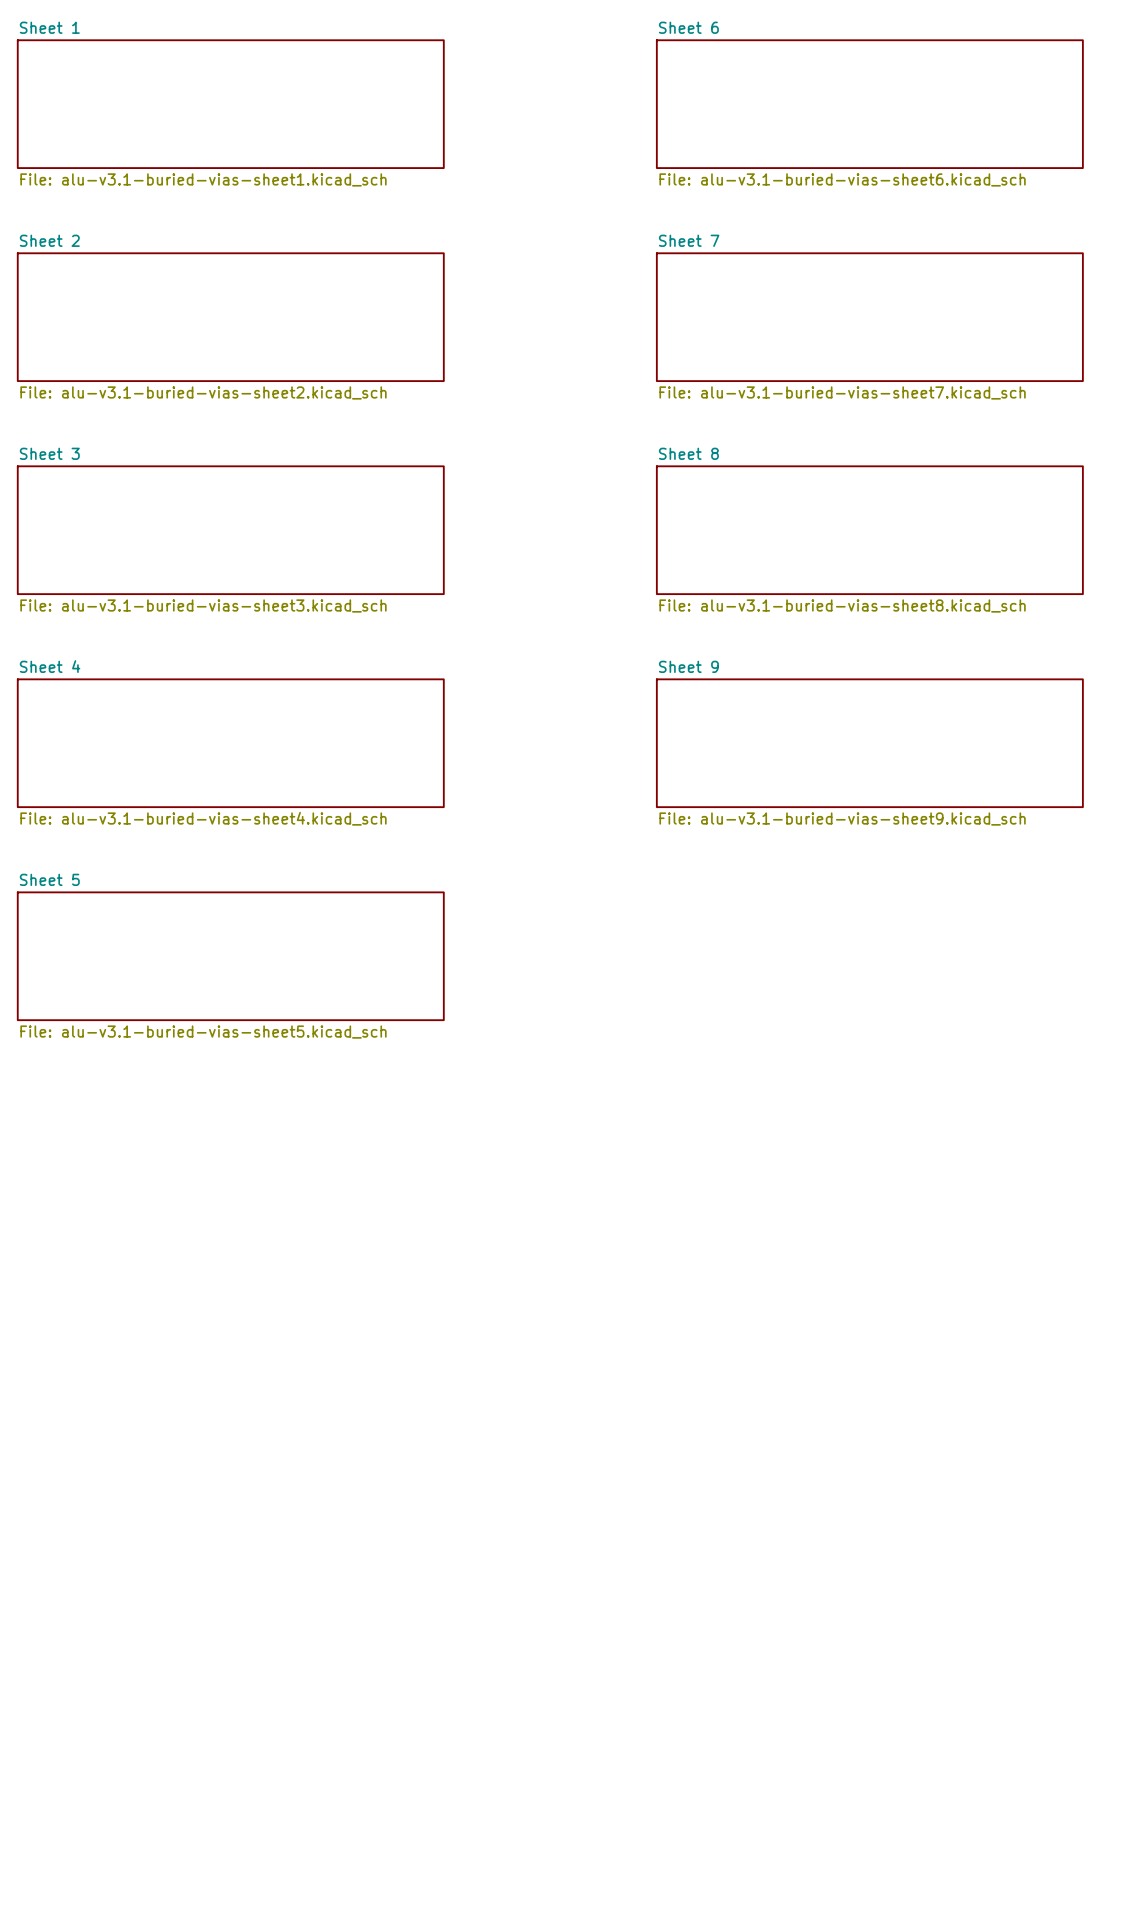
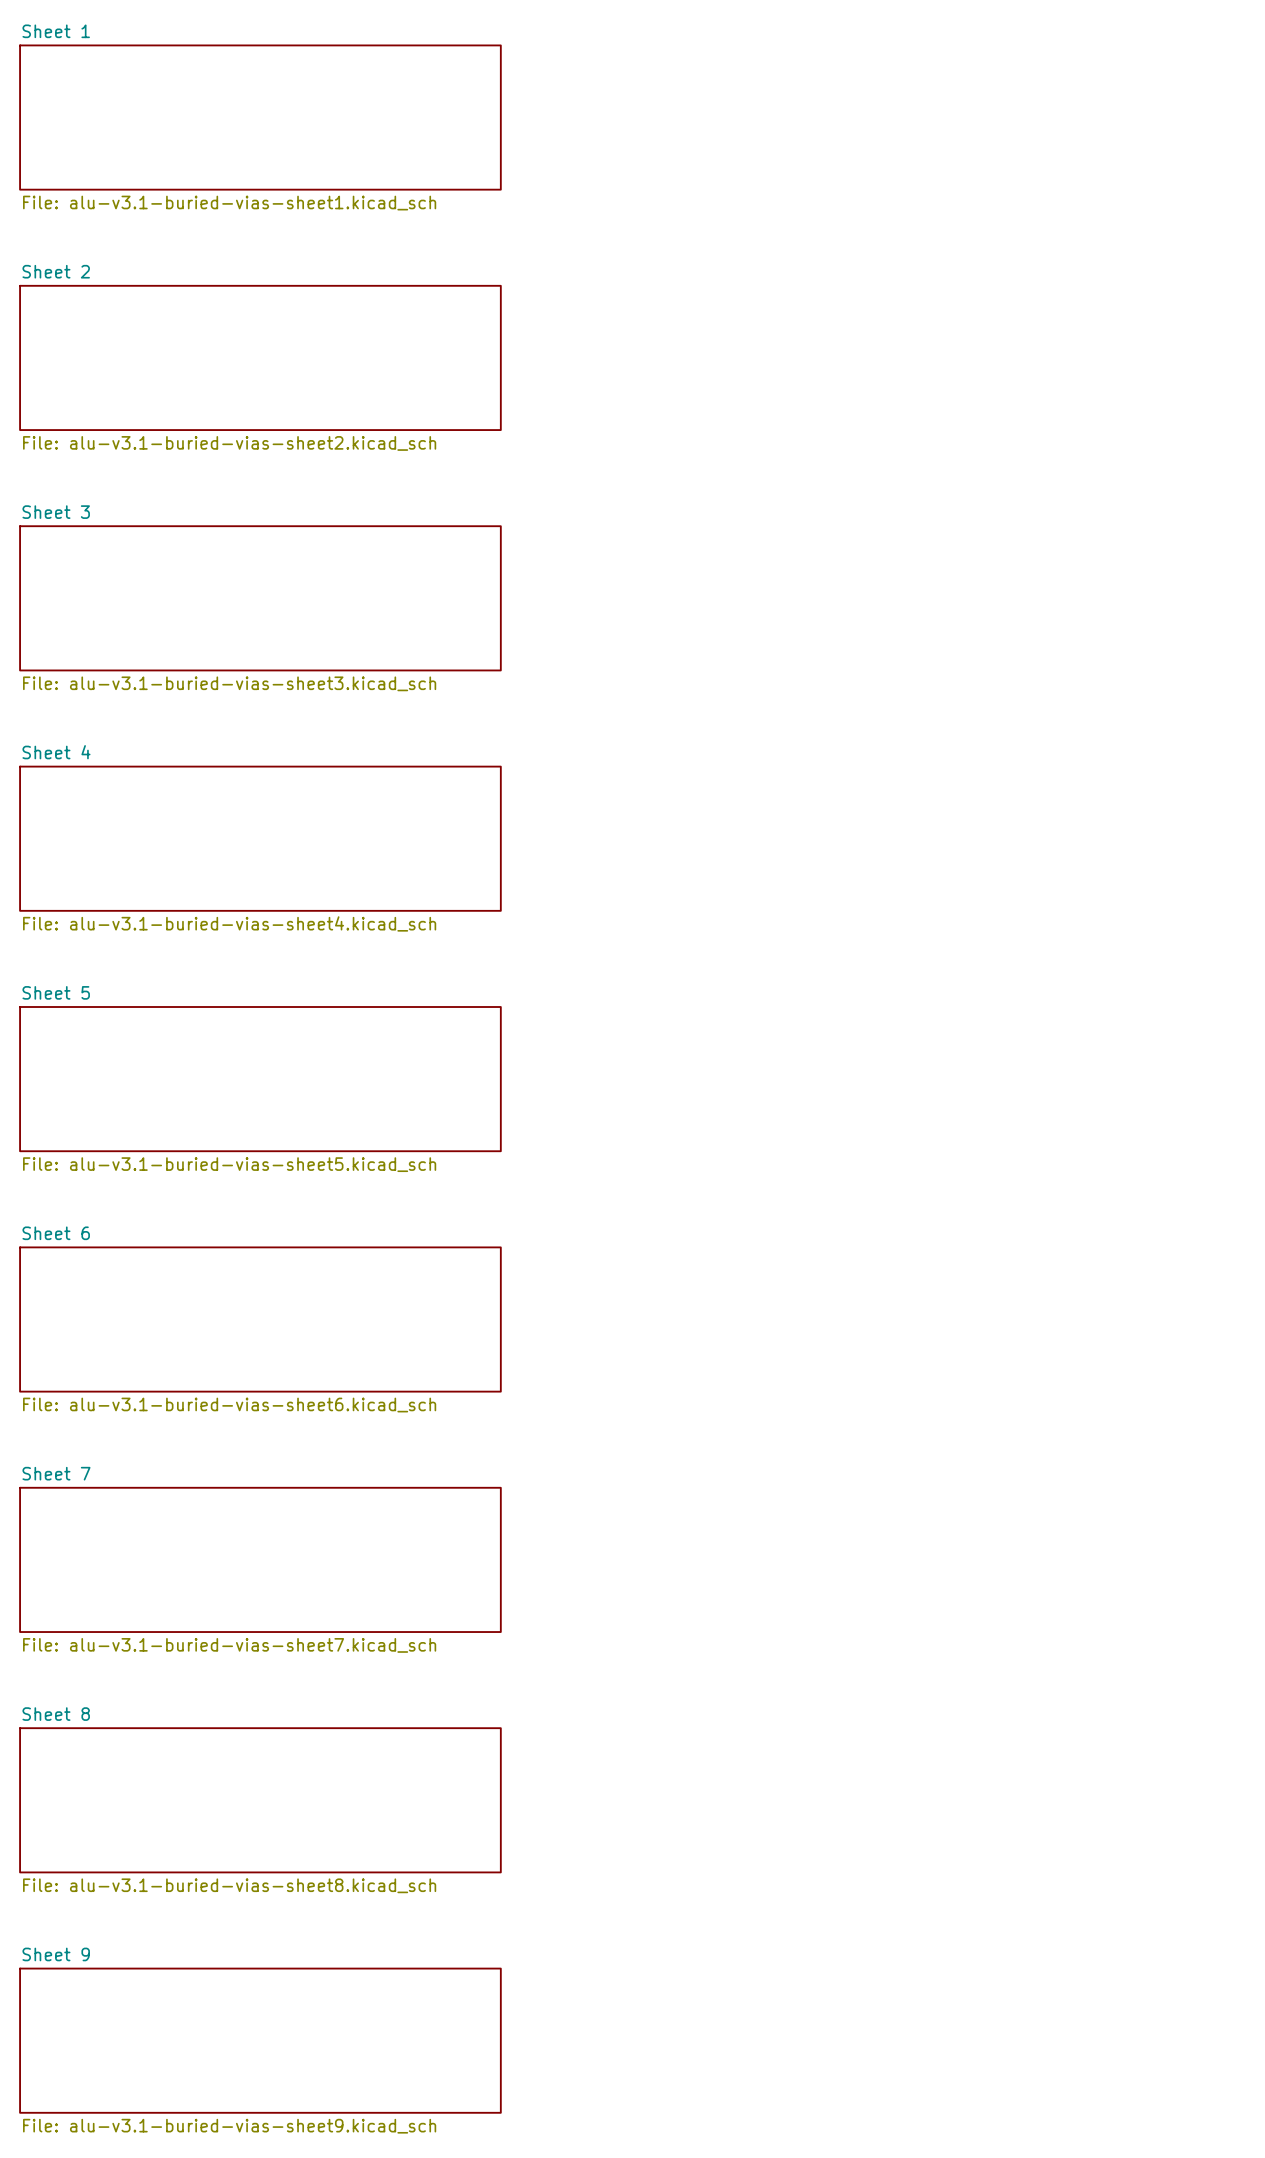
sheet Sheet 6 position: (869, 104) -> (260, 1319)
sheet Sheet 7 position: (869, 317) -> (260, 1559)
sheet Sheet 8 position: (869, 530) -> (260, 1800)
sheet Sheet 9 position: (869, 743) -> (260, 2040)

